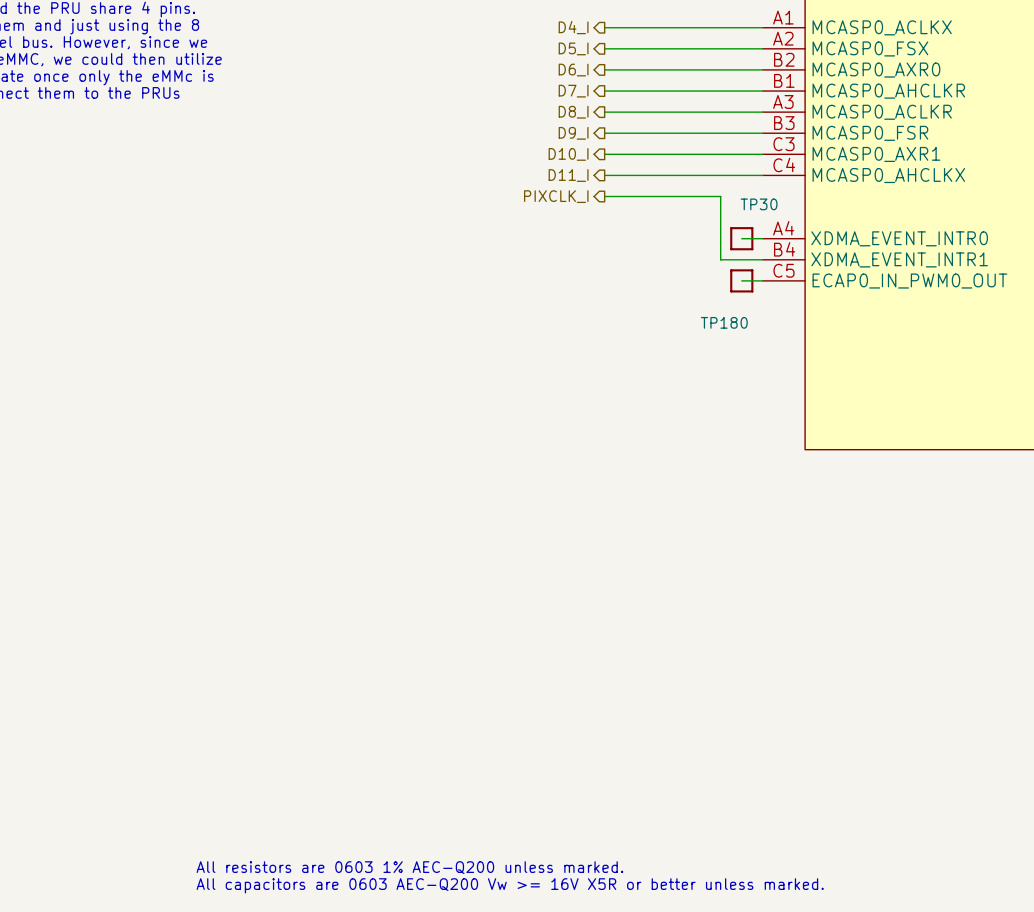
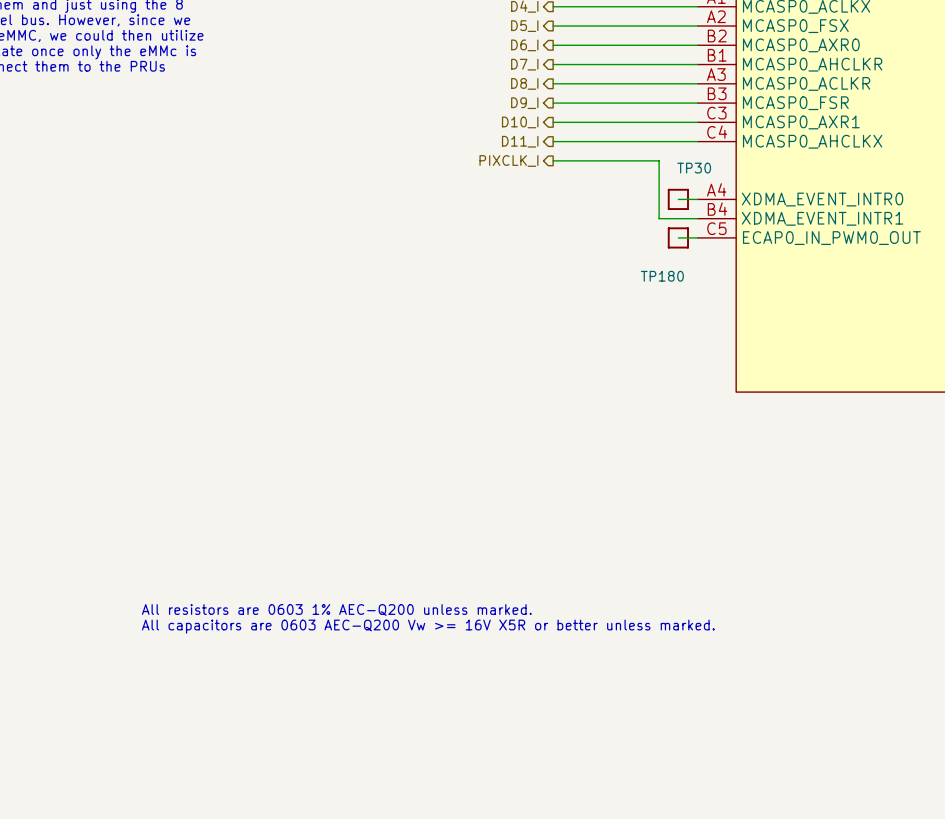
text position: All resistors are 0603 1% AEC-Q200 unless marked. (409, 867) -> All resistors are 0603 1% AEC-Q200 unless marked. (336, 609)
text position: All capacitors are 0603 AEC-Q200 Vw >= 16V X5R or better unless marked. (510, 885) -> All capacitors are 0603 AEC-Q200 Vw >= 16V X5R or better unless marked. (428, 626)

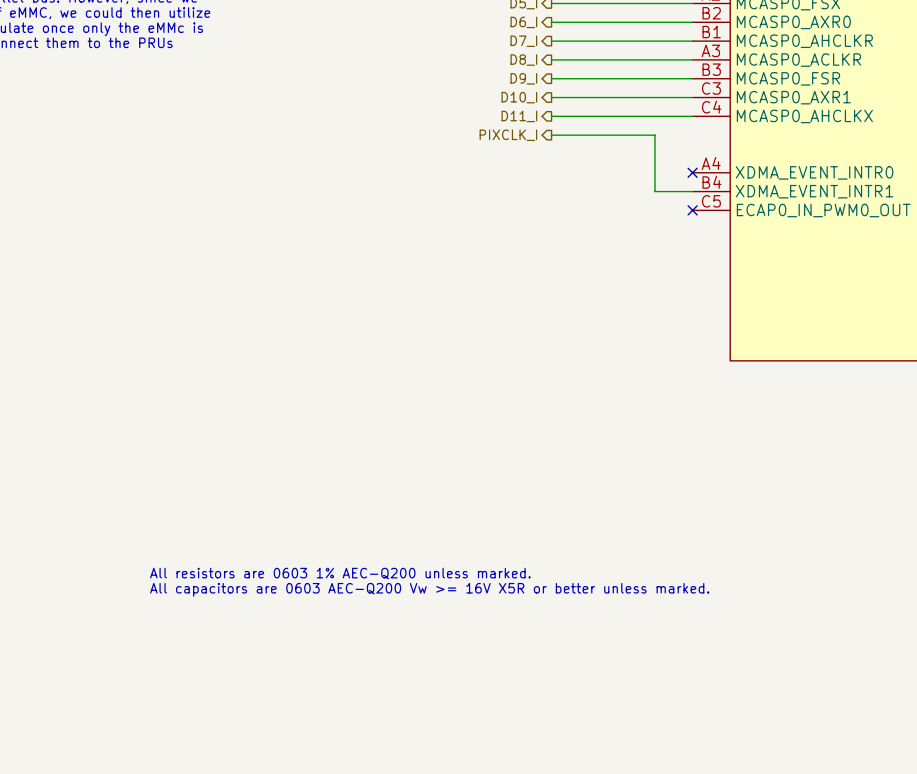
wire: (678, 199) (697, 199) -> none
TP30: (678, 199) -> none
no-connect mark: none -> (692, 172)
wire: (678, 237) (697, 237) -> none
TP180: (678, 237) -> none
no-connect mark: none -> (692, 210)

